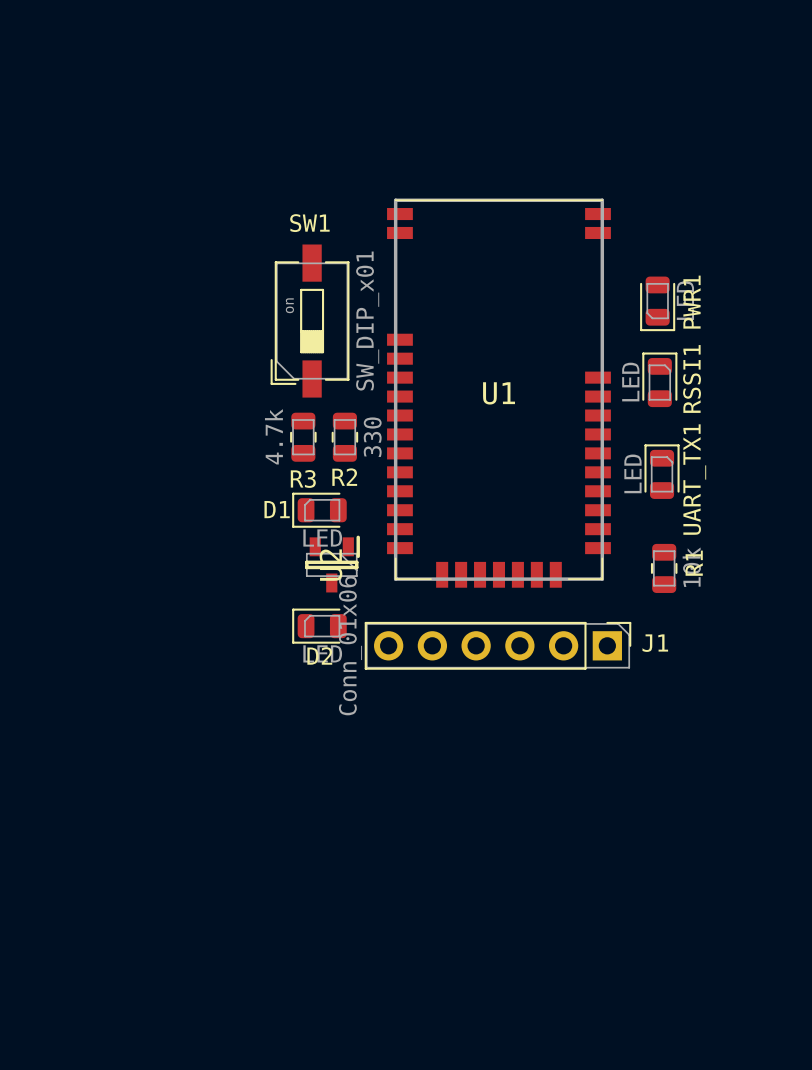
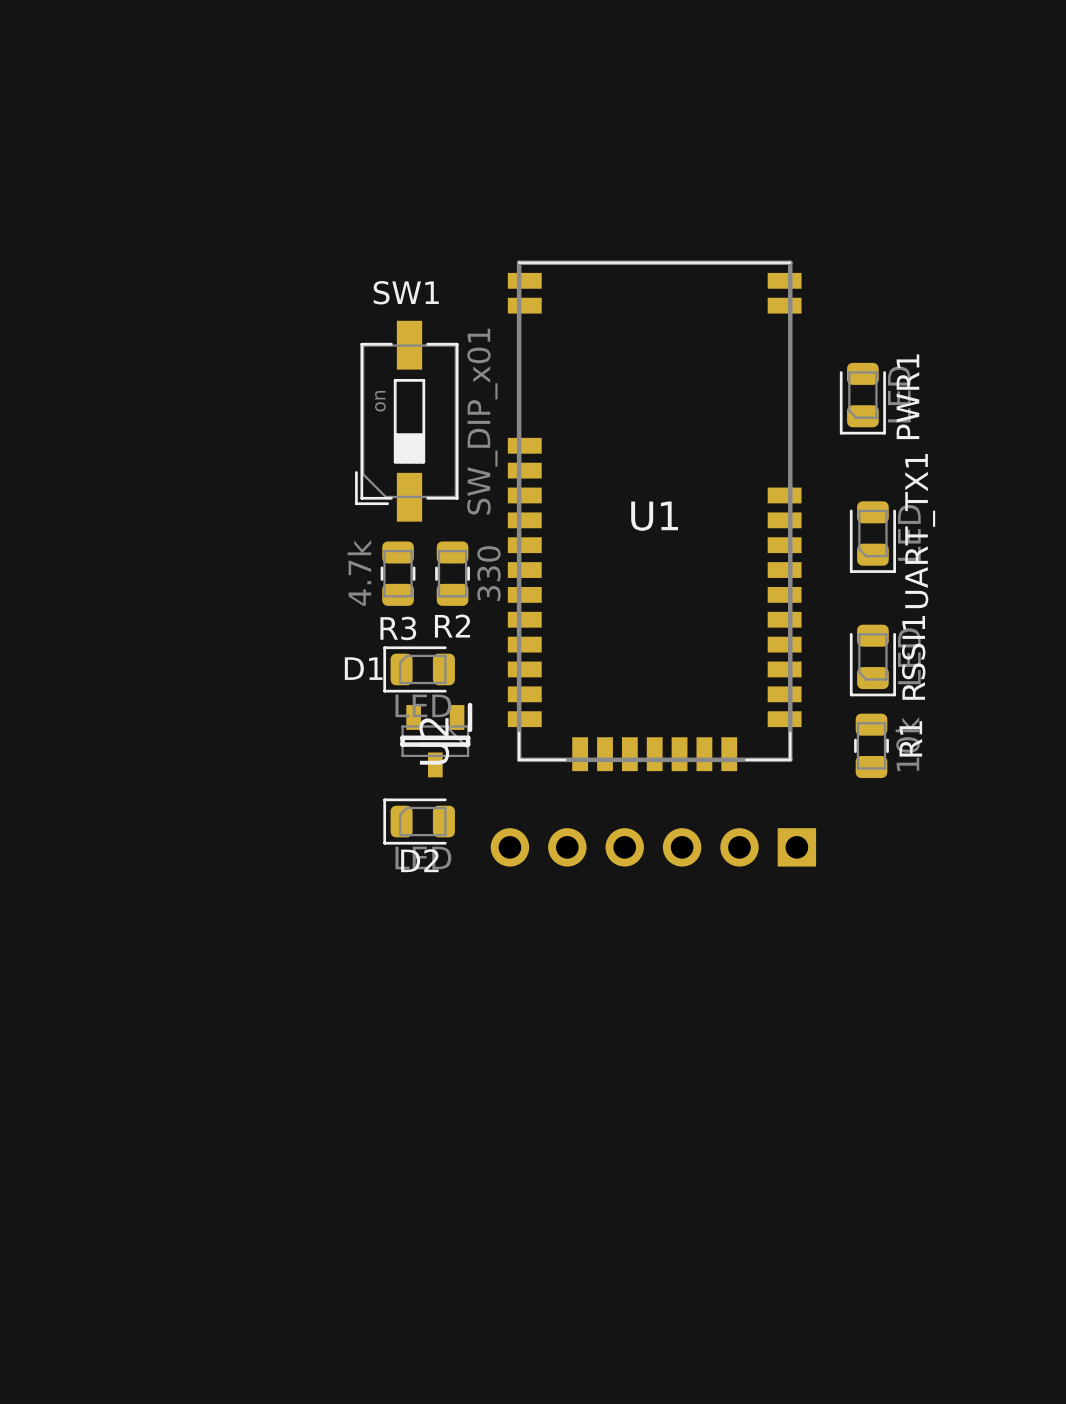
RSSI1 rotation: 0° (659, 379) -> 180° (872, 660)
RSSI1 position: (659, 379) -> (872, 660)
UART_TX1 rotation: 0° (662, 471) -> 180° (872, 537)
UART_TX1 position: (662, 471) -> (872, 537)
J1 side: top (498, 645) -> bottom (653, 847)

